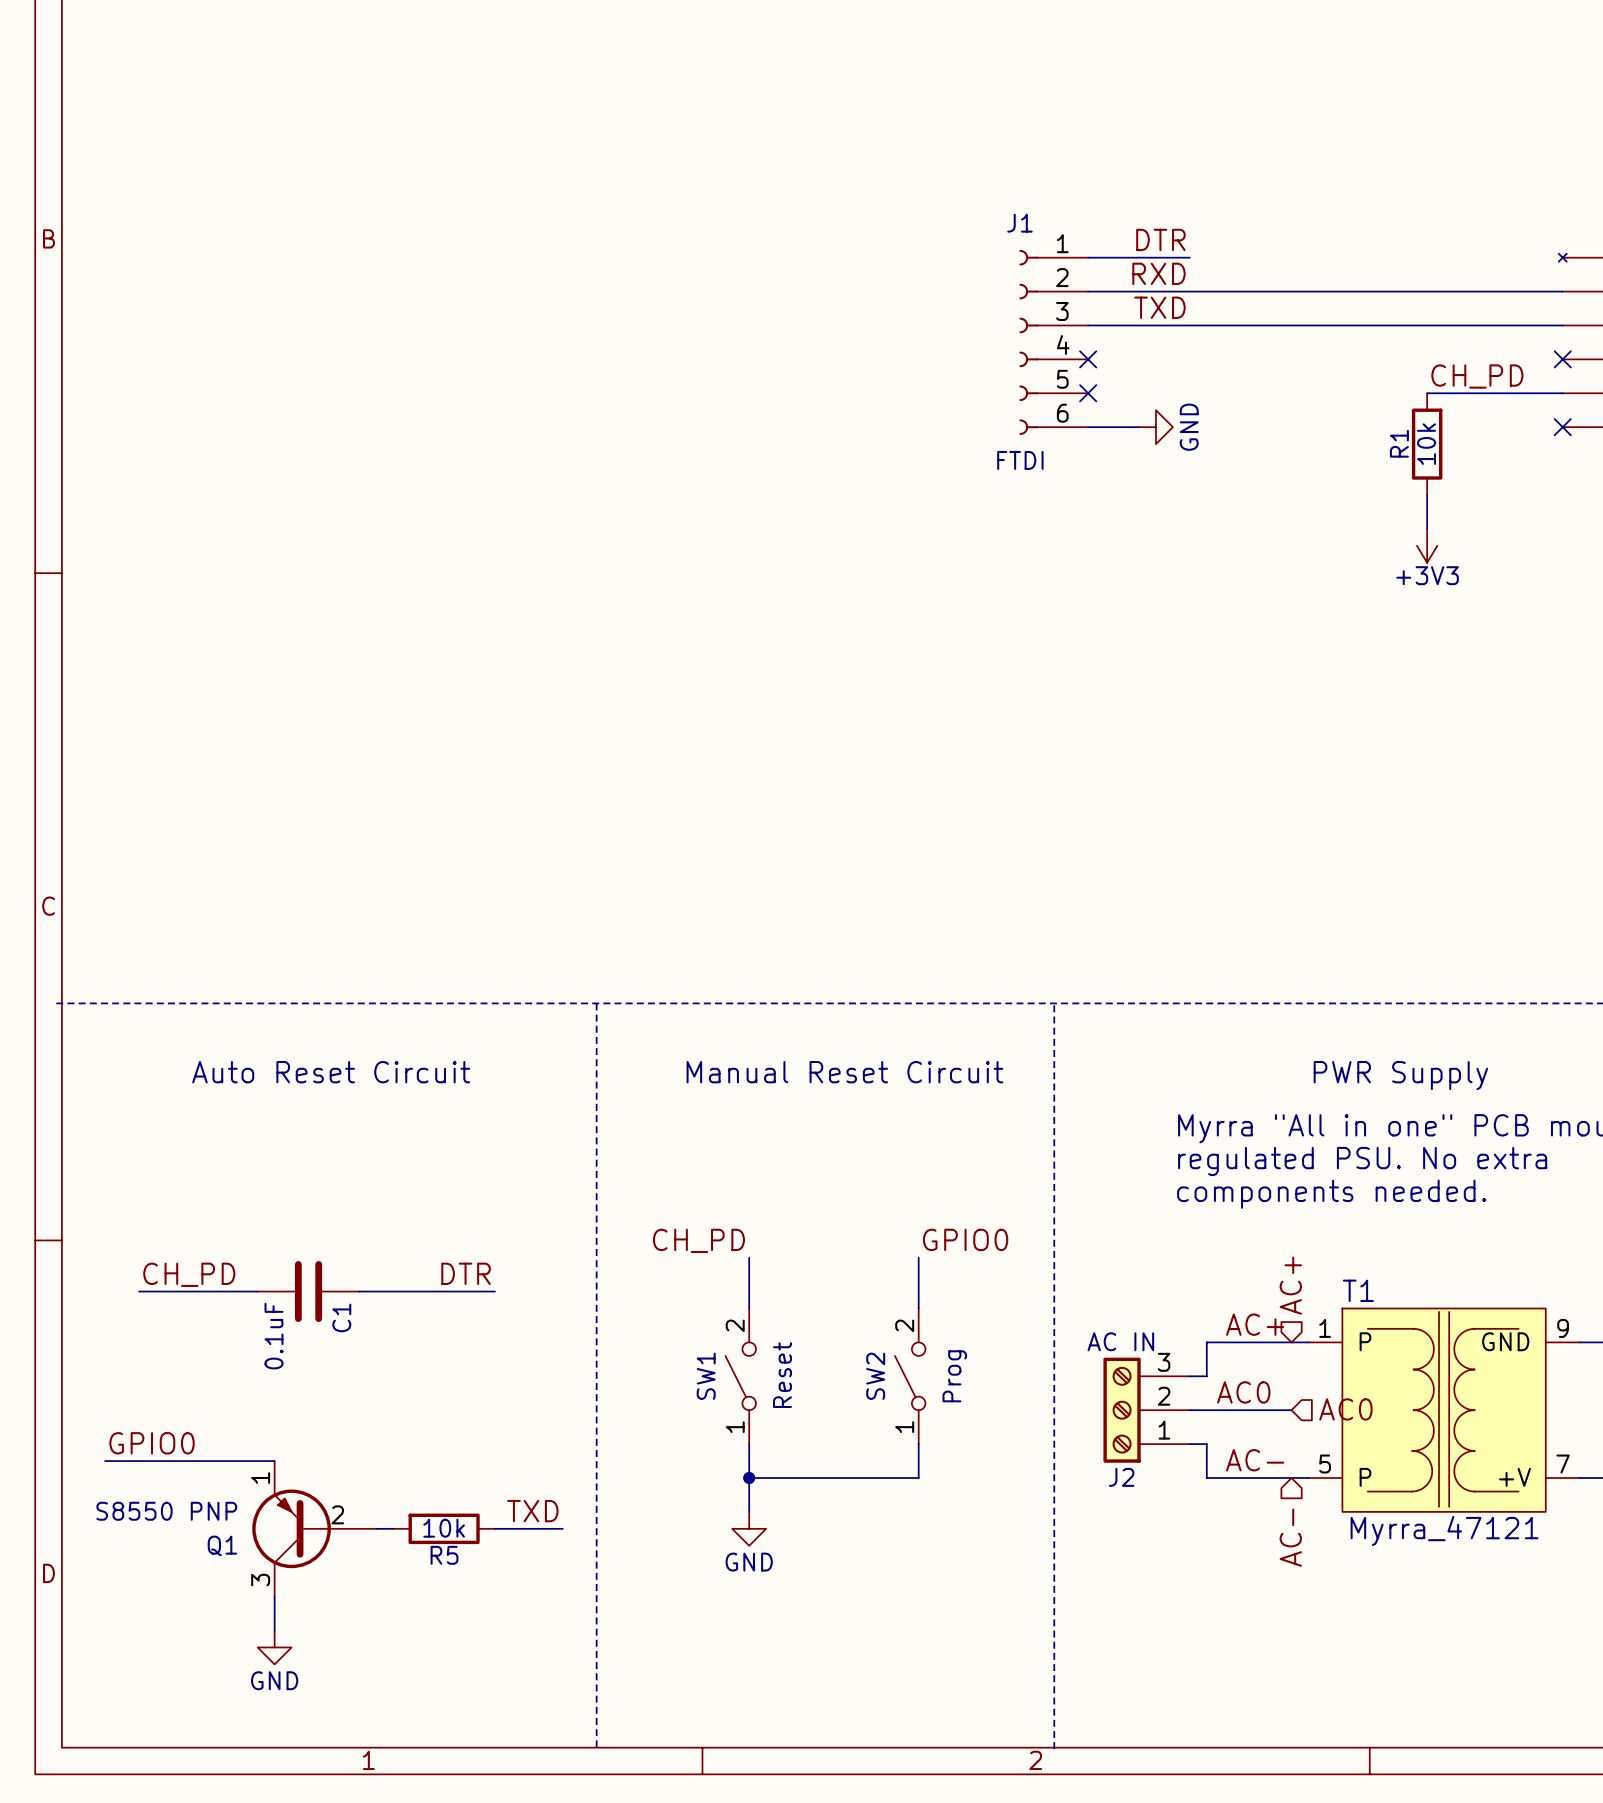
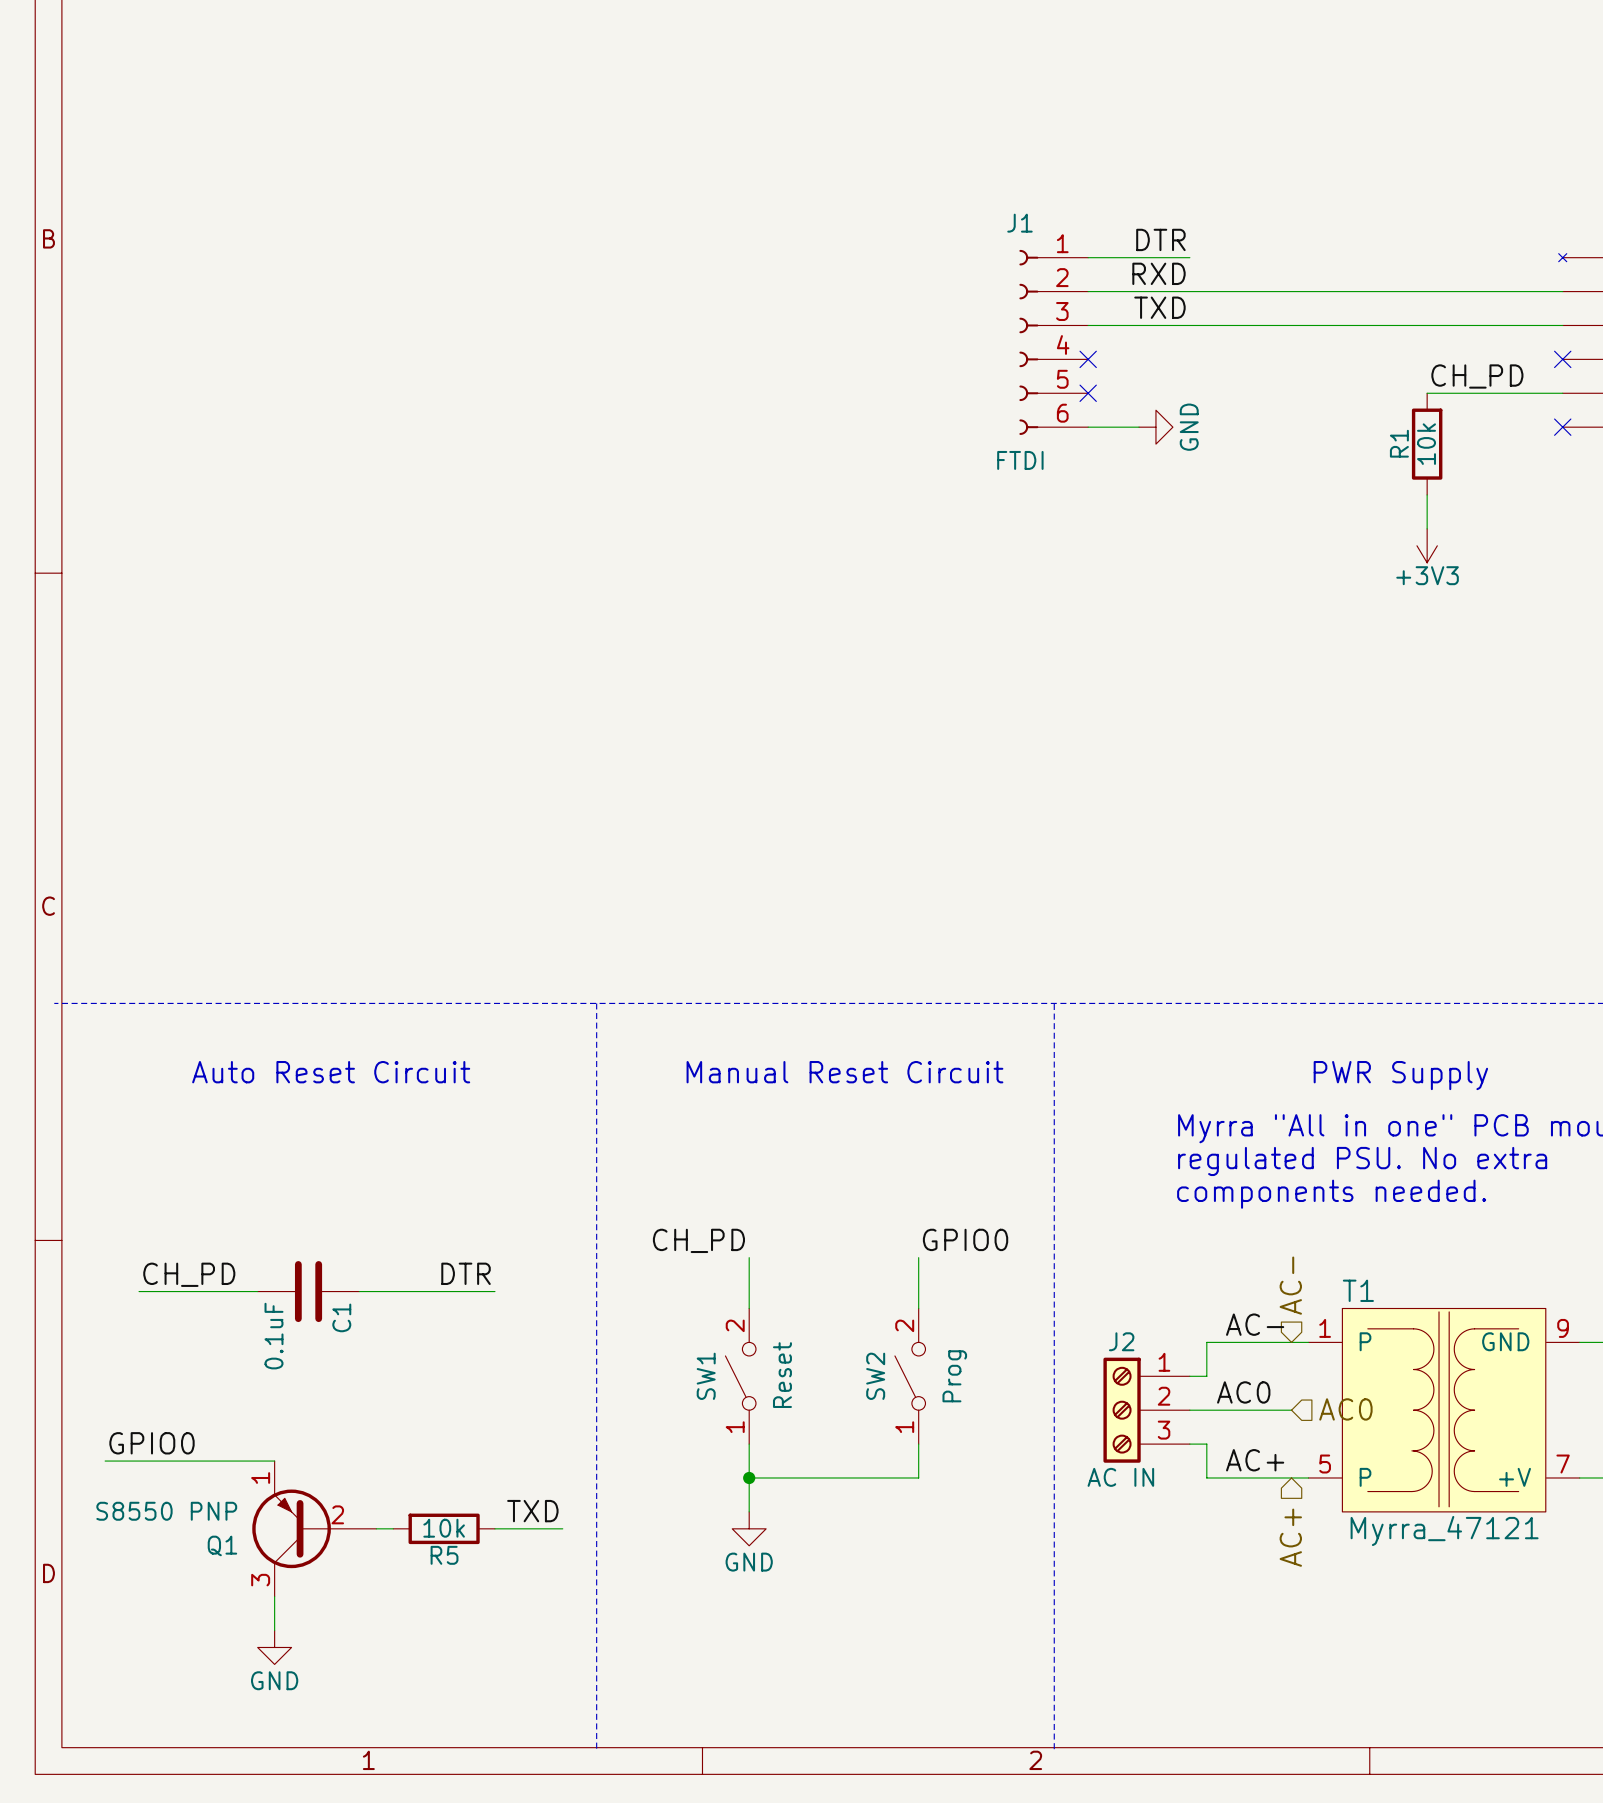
hierarchical label: AC+ (1290, 1285) -> AC- (1290, 1285)
label: AC+ (1255, 1324) -> AC- (1255, 1324)
J2 flip: as is (1122, 1410) -> up-down (1122, 1410)
label: AC- (1255, 1460) -> AC+ (1255, 1460)
hierarchical label: AC- (1290, 1537) -> AC+ (1290, 1537)

